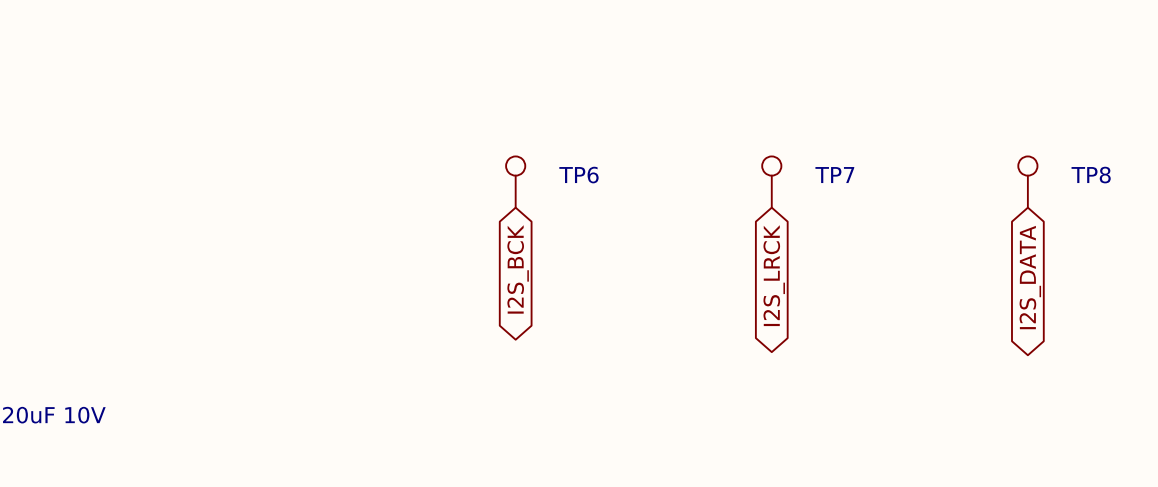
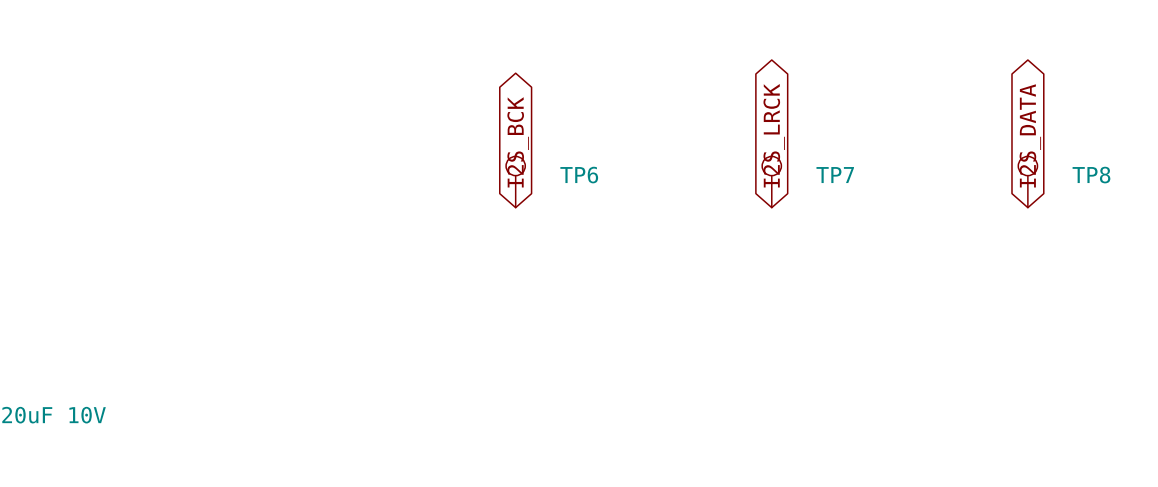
global label rotation: 0° (518, 269) -> 180° (518, 142)
global label rotation: 0° (774, 275) -> 180° (774, 135)
global label rotation: 0° (1030, 277) -> 180° (1030, 135)
global label position: I2S_DATA (1030, 277) -> I2S_DATA (1030, 135)

